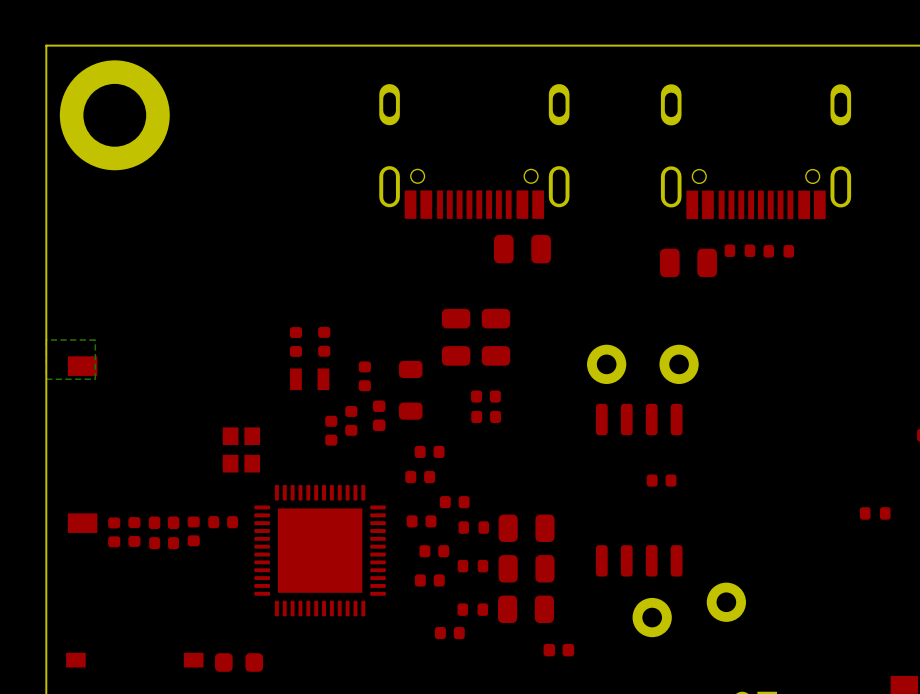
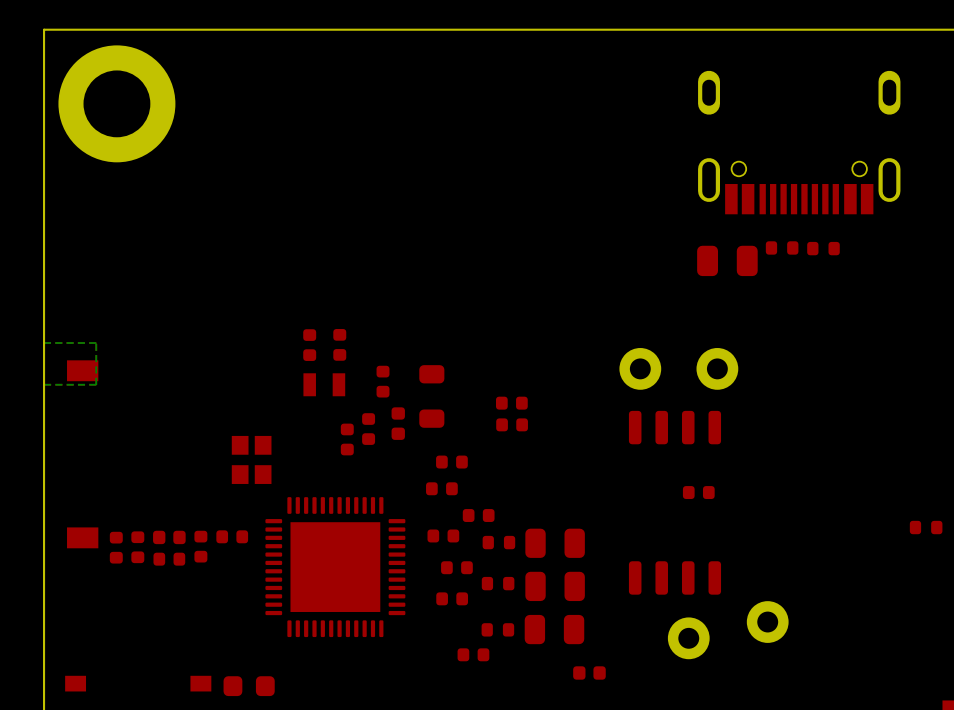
part: (474, 151) -> none
part: (522, 249) -> none
part: (456, 337) -> none
part: (495, 337) -> none

